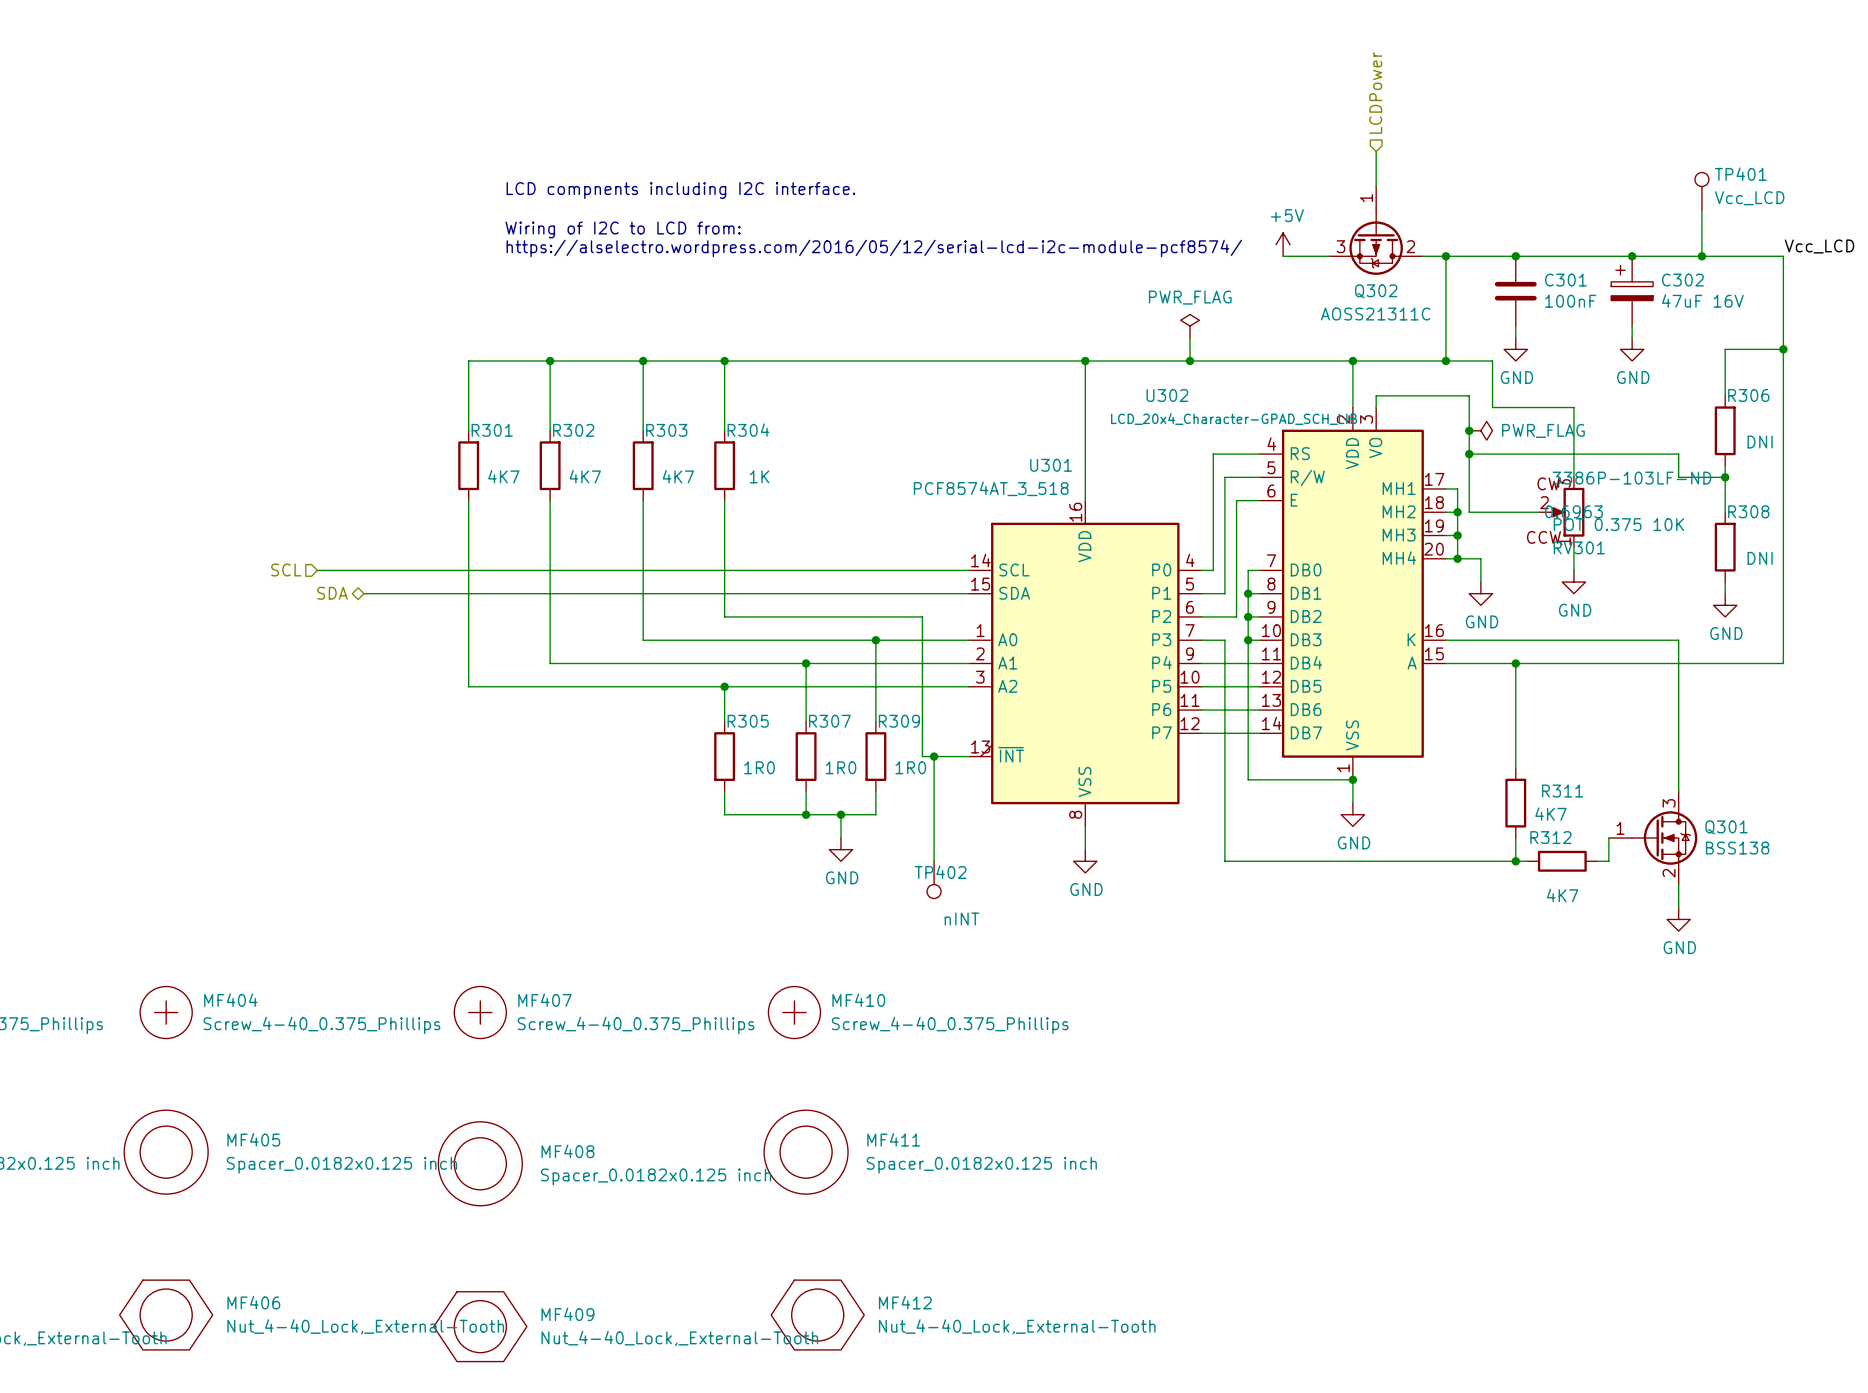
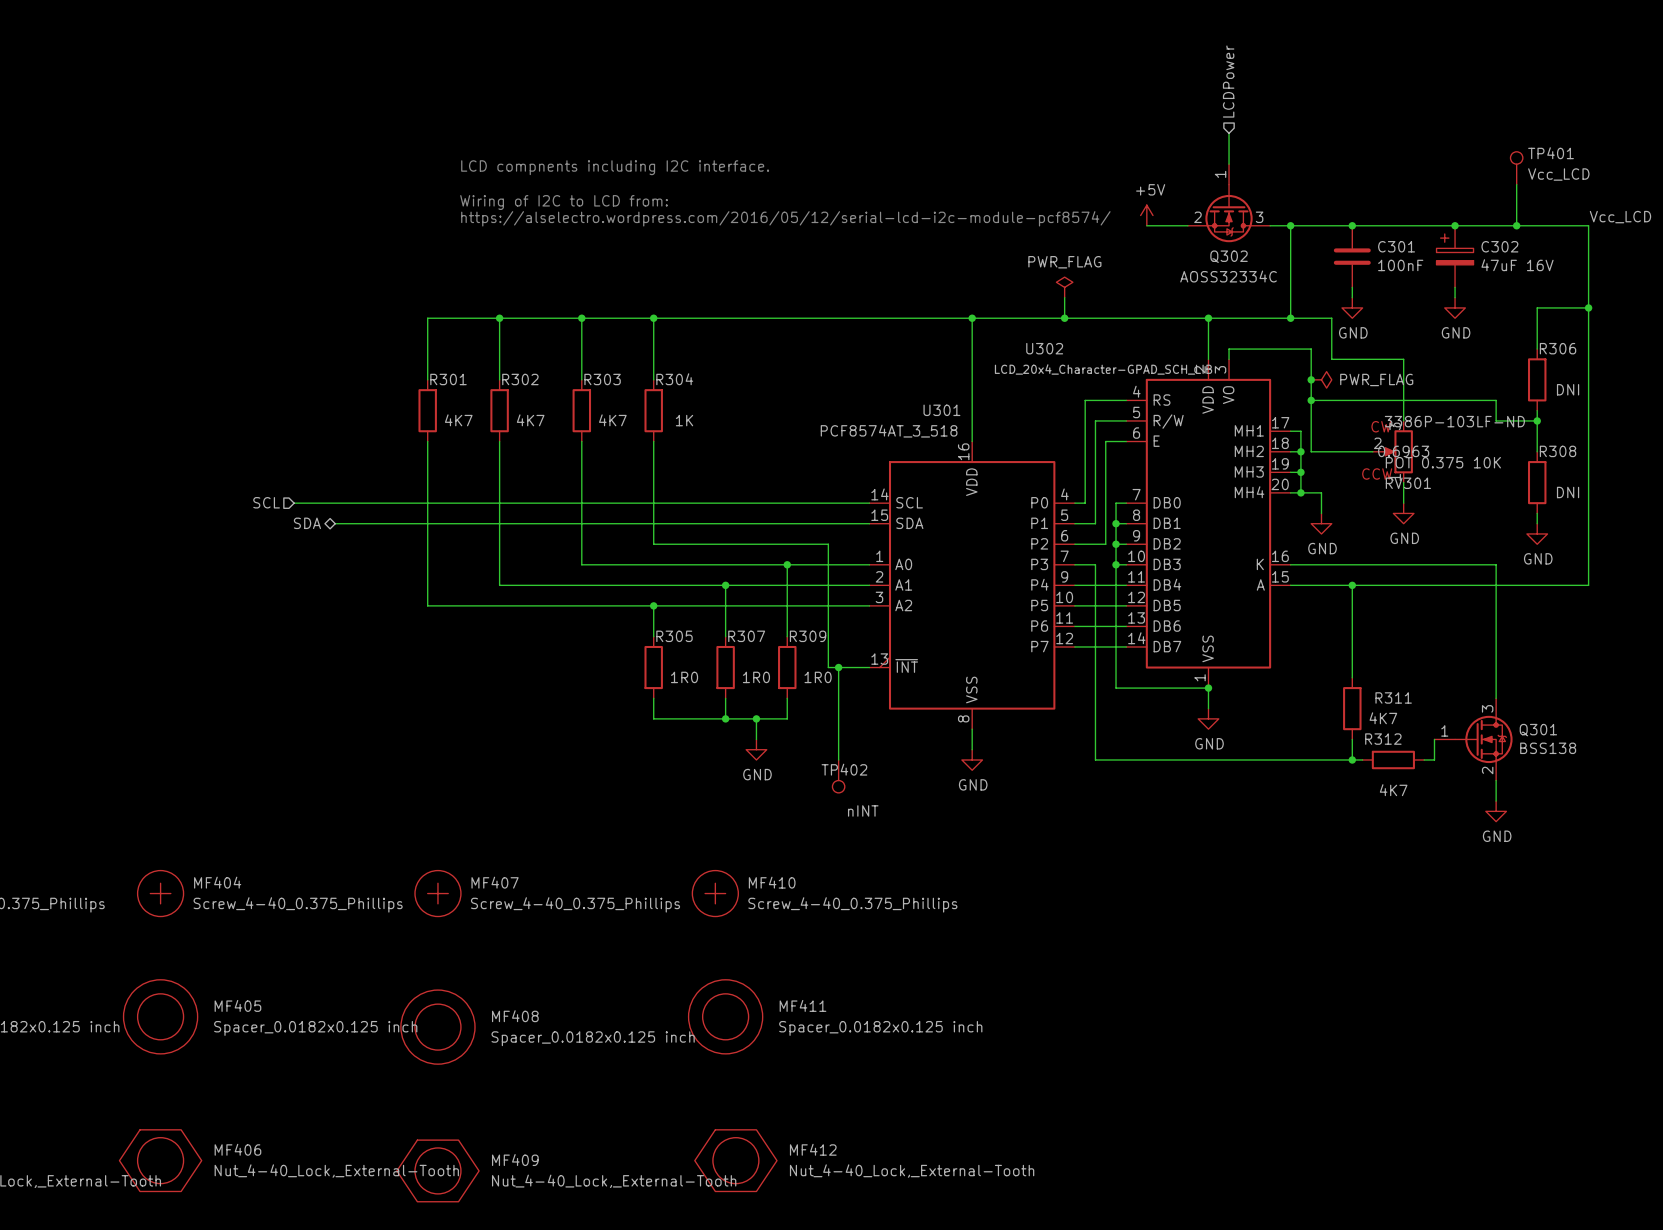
Q302 symbol: [1329, 186, 1423, 275] -> [1187, 164, 1271, 243]
Q302 value: AOSS21311C (1375, 314) -> AOSS32334C (1228, 276)

